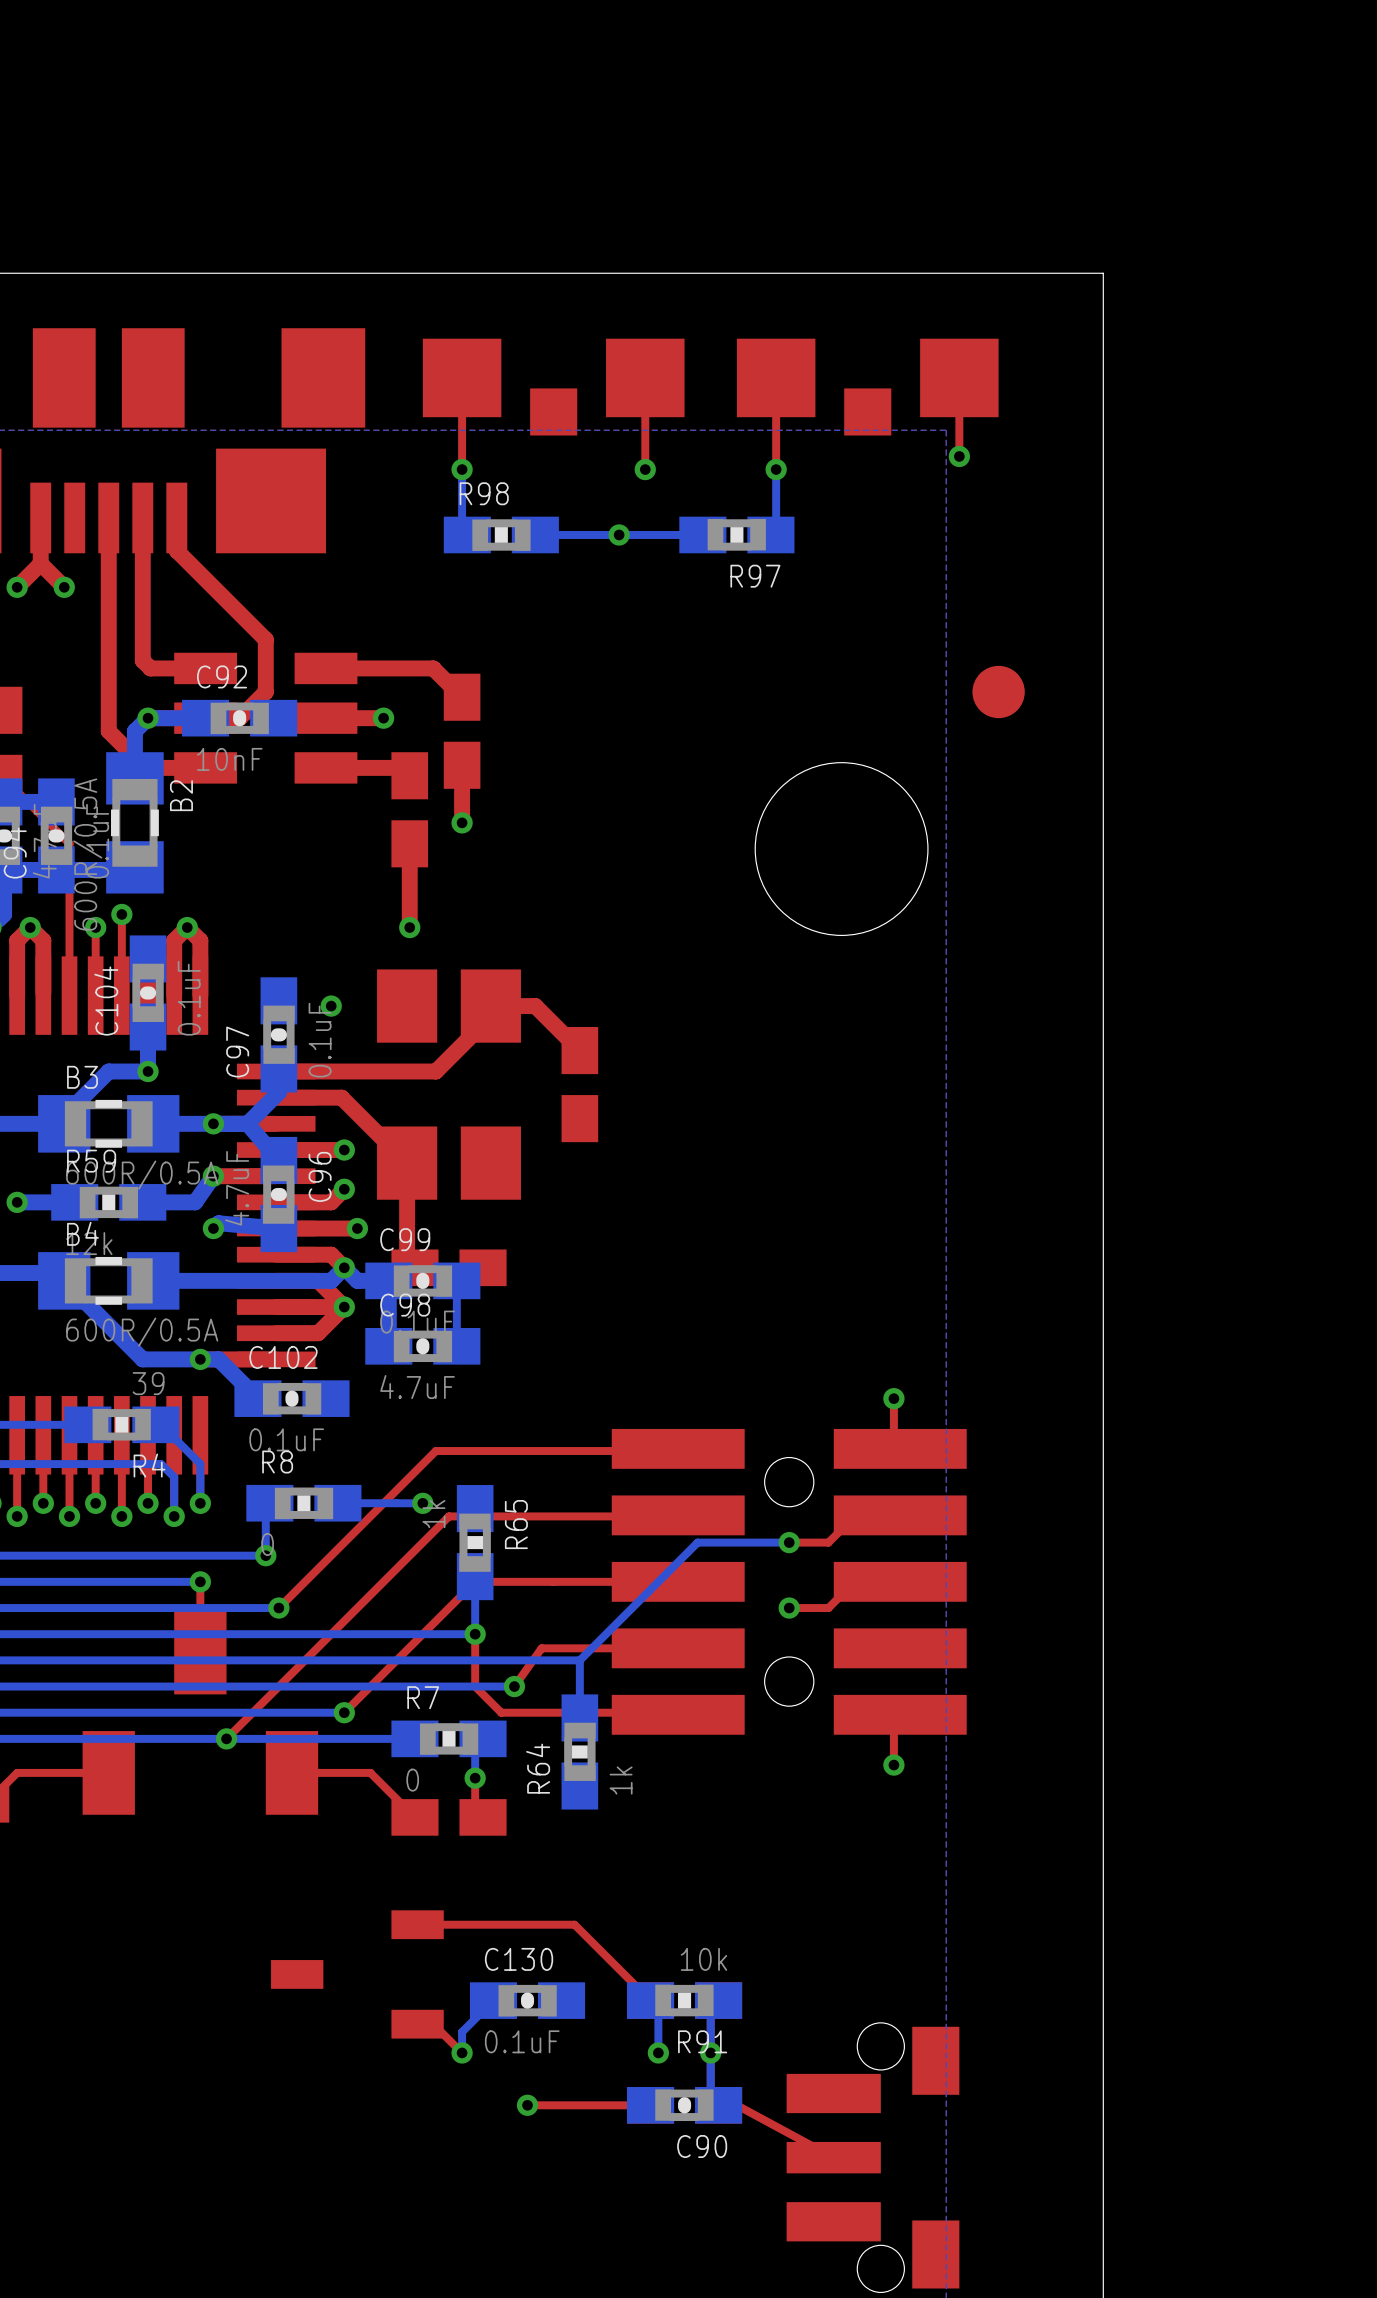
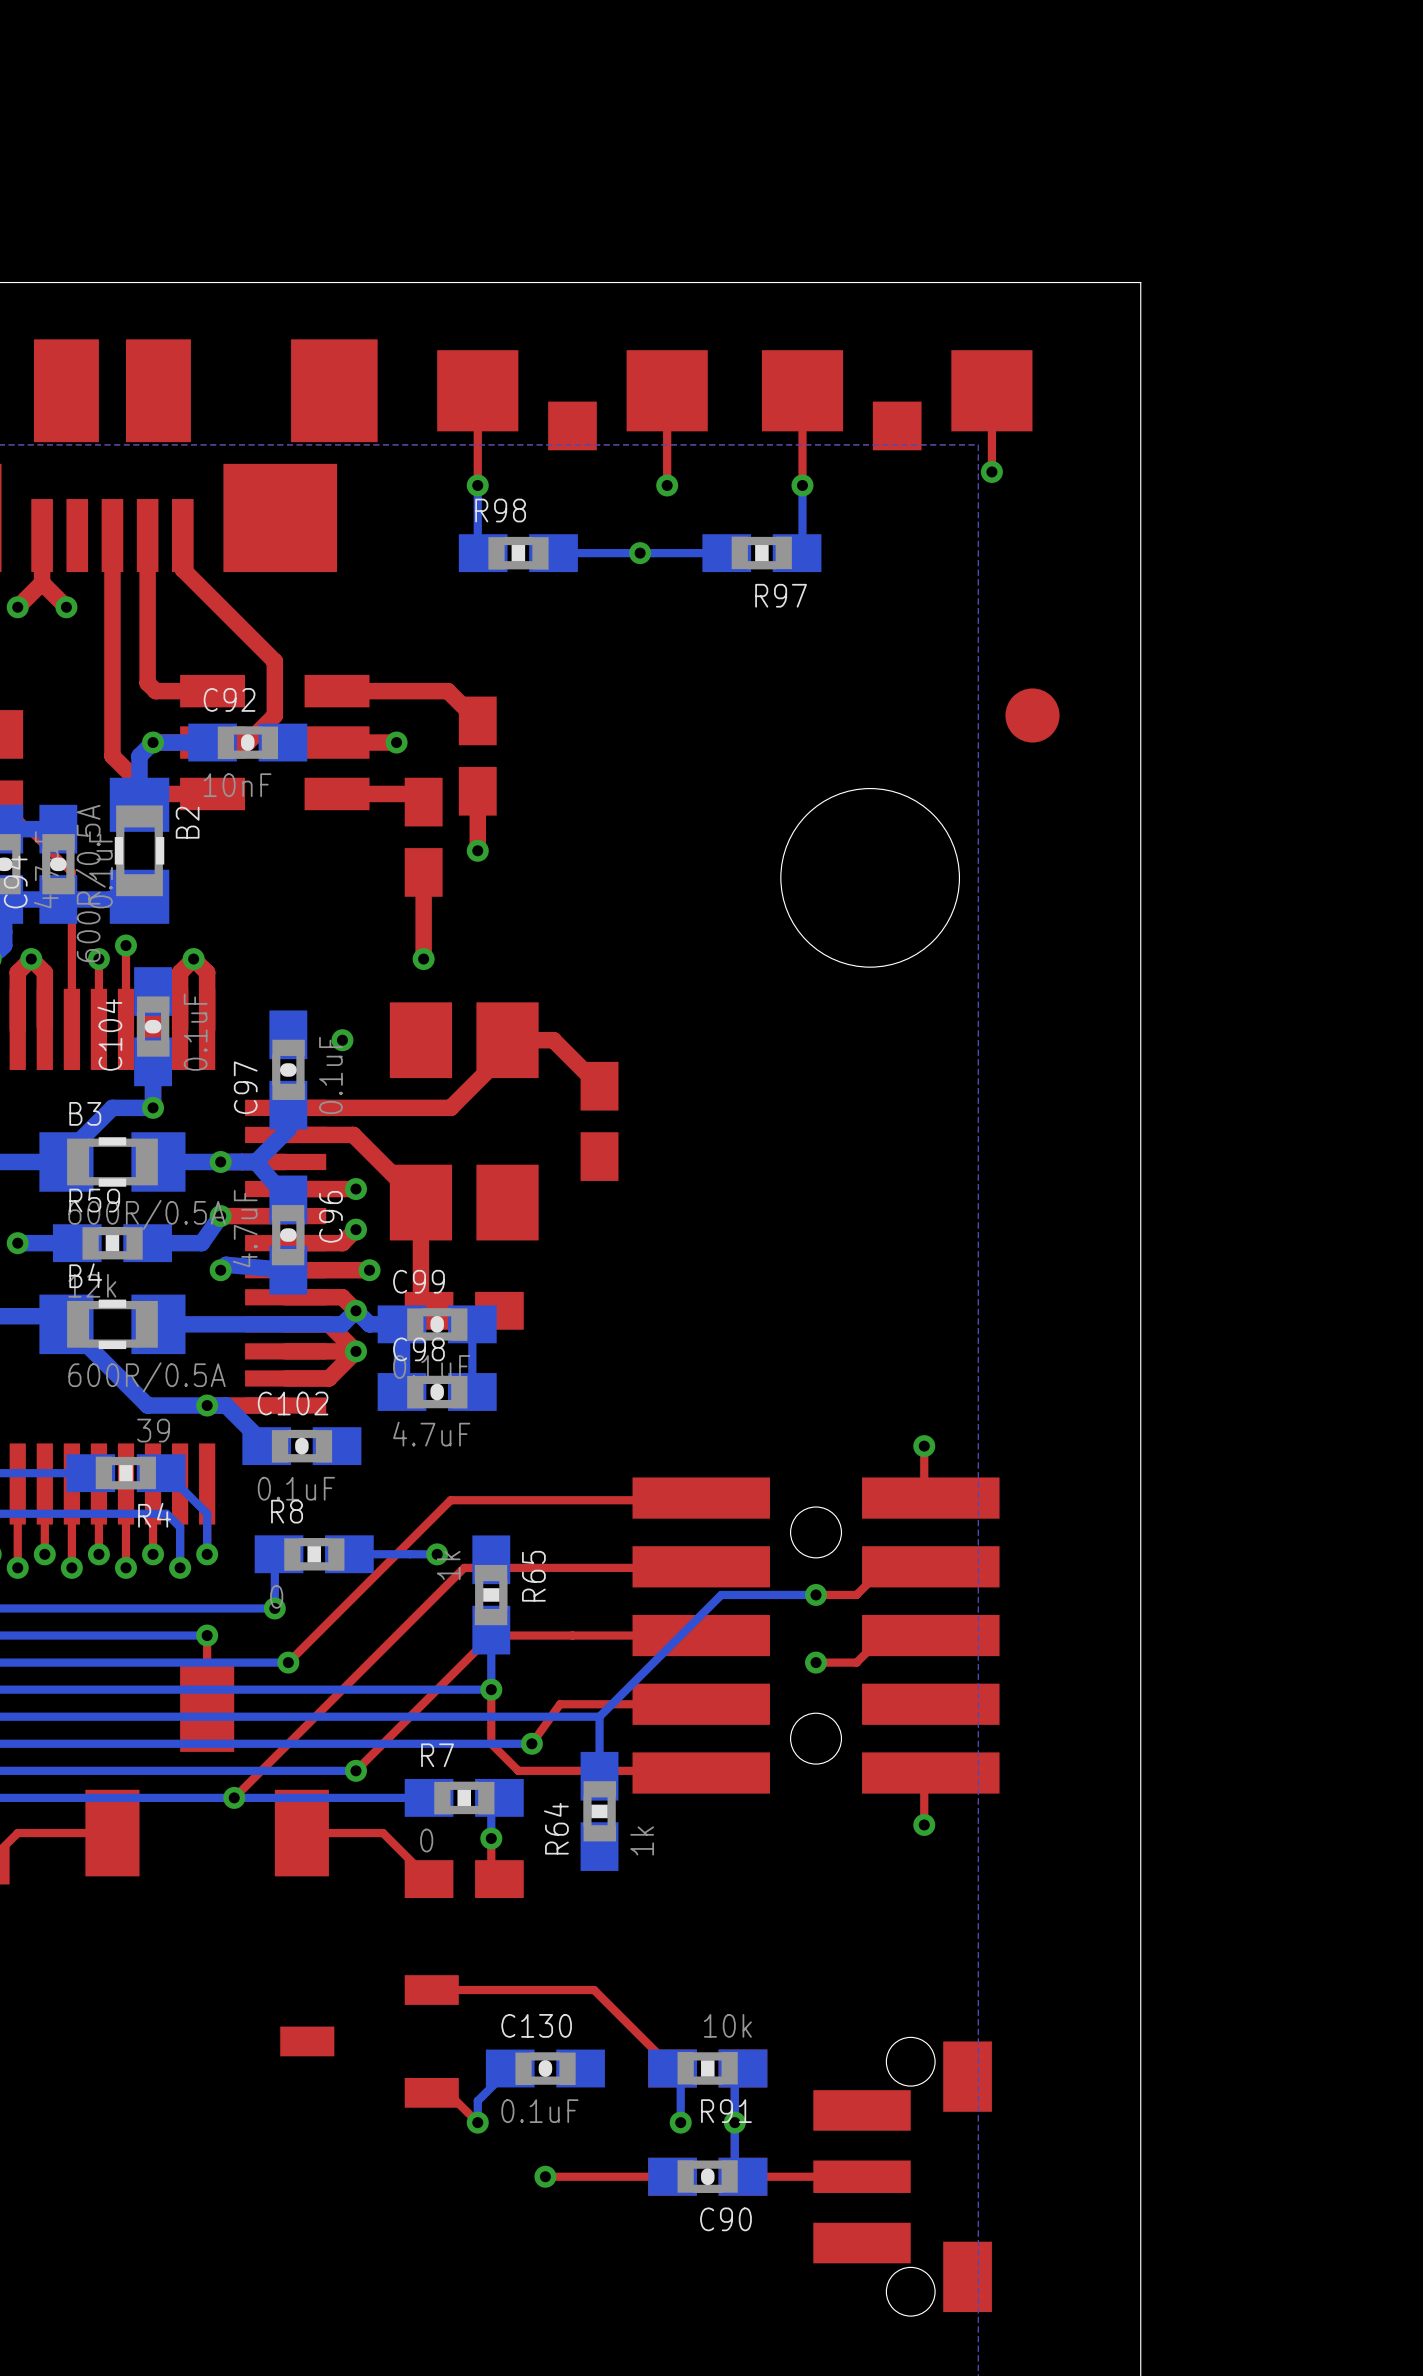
top track: (736, 2105) (833, 2157) -> (761, 2176) (862, 2176)
part position: (872, 2157) -> (902, 2176)

